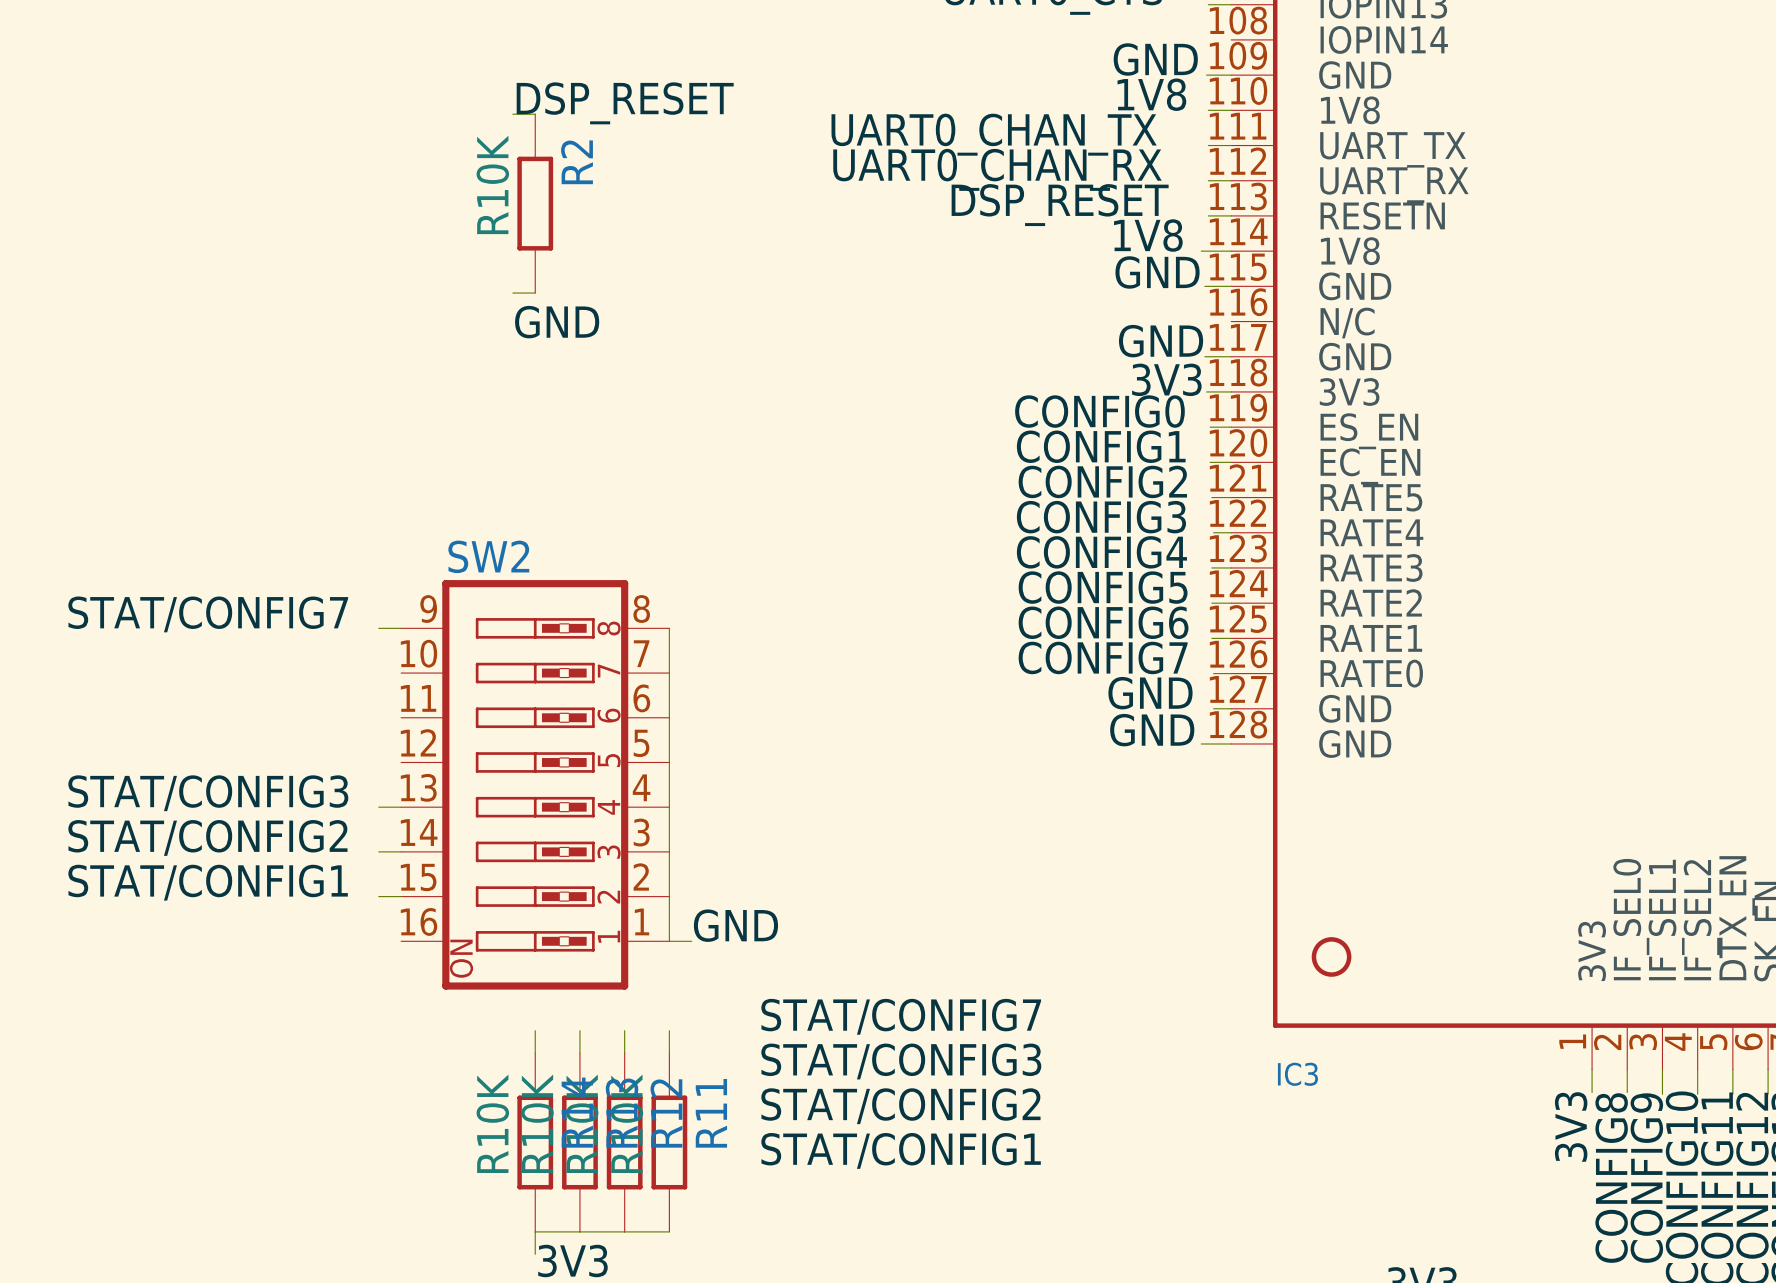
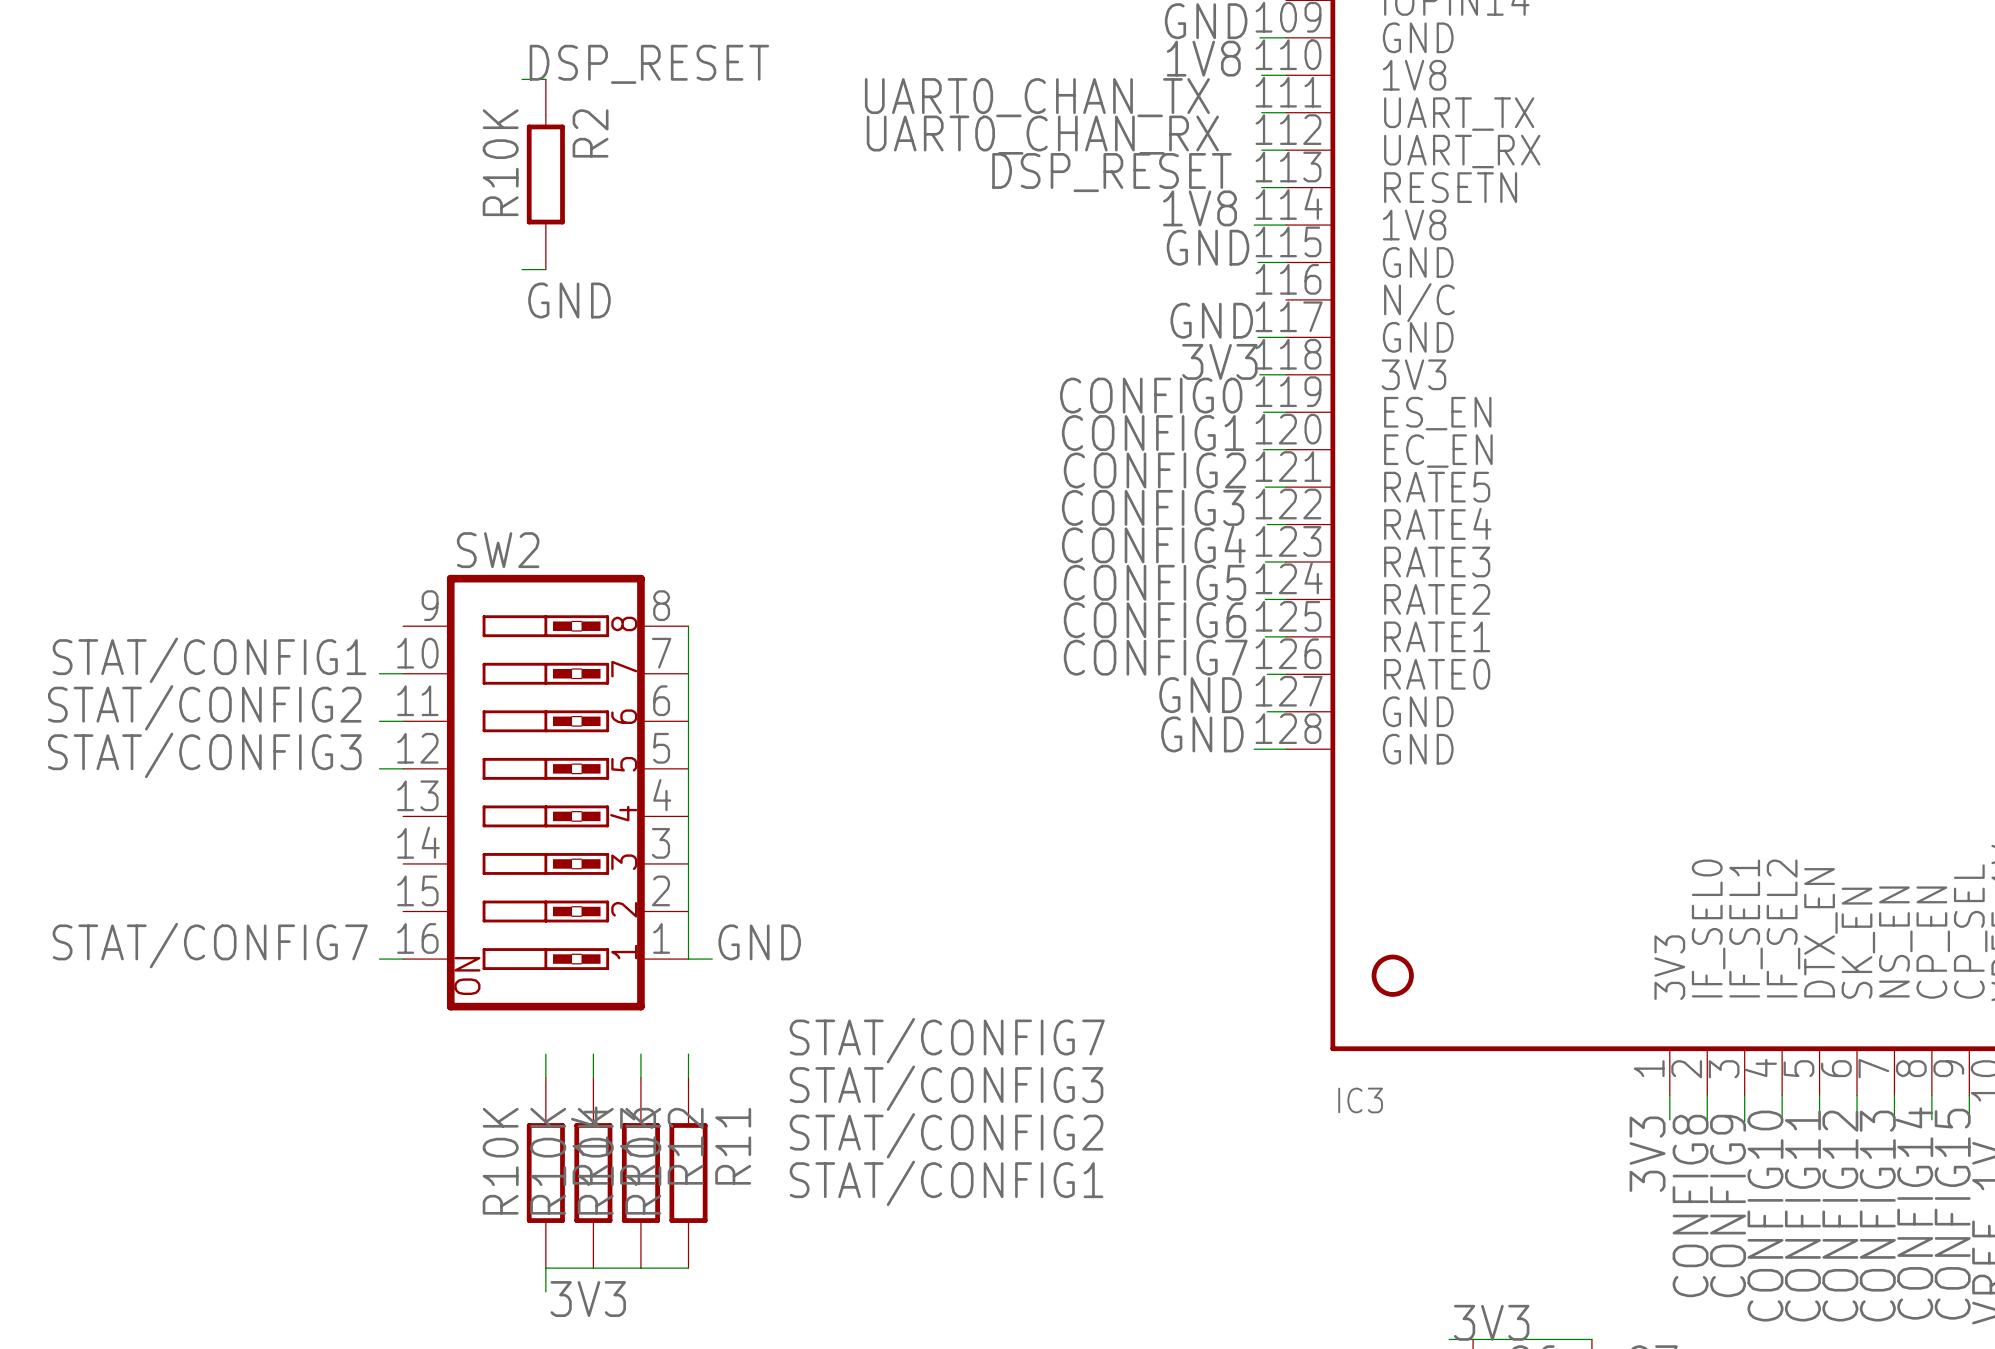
label position: STAT/CONFIG7 (208, 614) -> STAT/CONFIG7 (210, 945)
wire: (378, 628) (401, 628) -> (379, 959) (403, 959)
label position: STAT/CONFIG3 (208, 793) -> STAT/CONFIG3 (204, 755)
wire: (378, 807) (401, 807) -> (379, 673) (403, 673)
label position: STAT/CONFIG2 (207, 837) -> STAT/CONFIG2 (204, 707)
wire: (378, 851) (401, 851) -> (379, 721) (403, 721)
label position: STAT/CONFIG1 (208, 882) -> STAT/CONFIG1 (209, 660)
wire: (378, 896) (401, 896) -> (379, 768) (403, 768)

